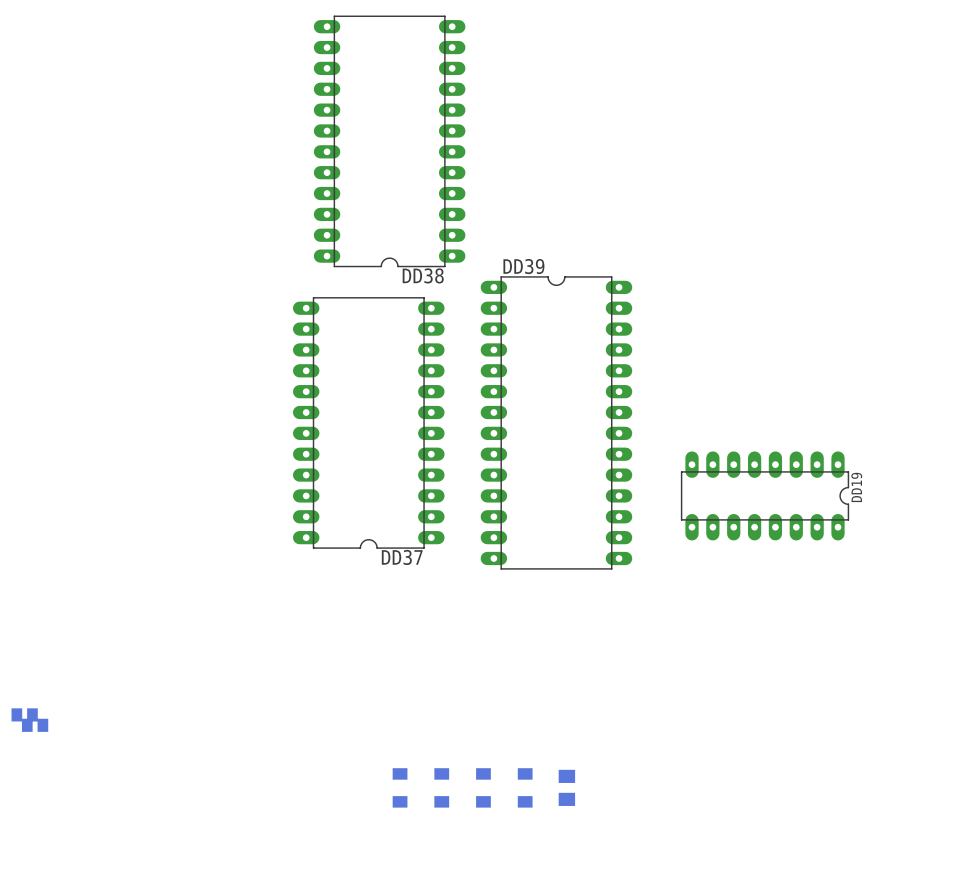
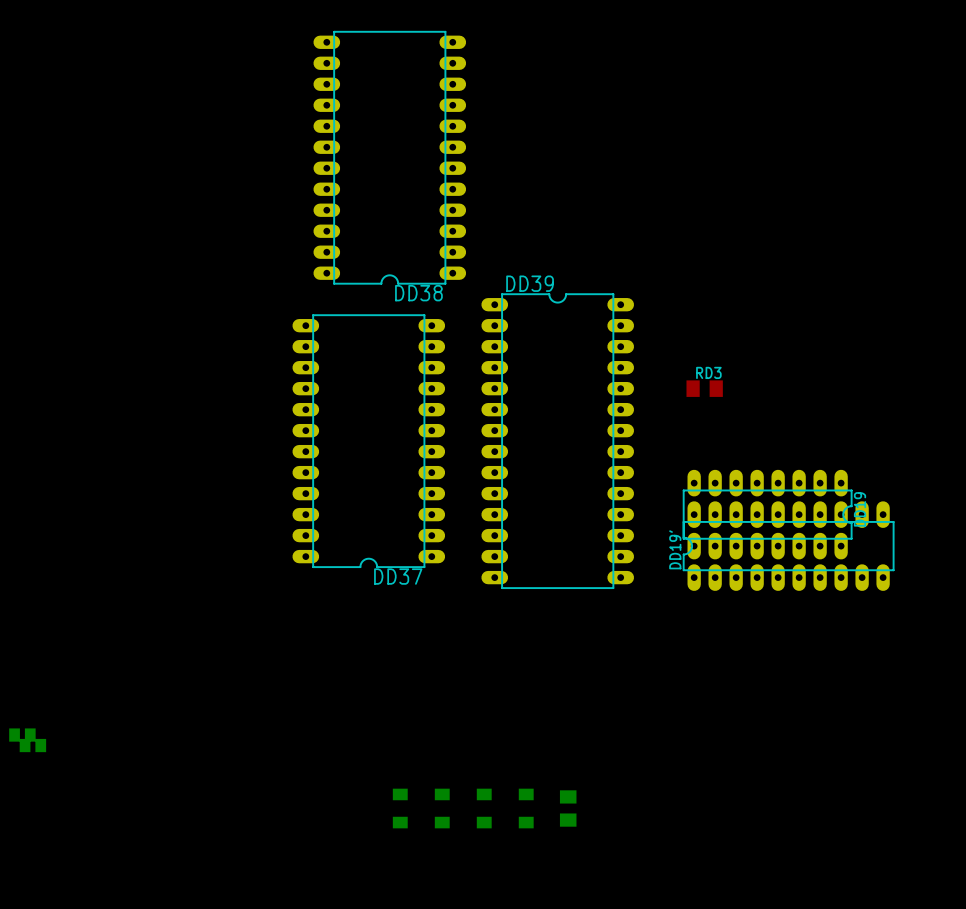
RD3: none -> (704, 388)
DD19': none -> (788, 546)

